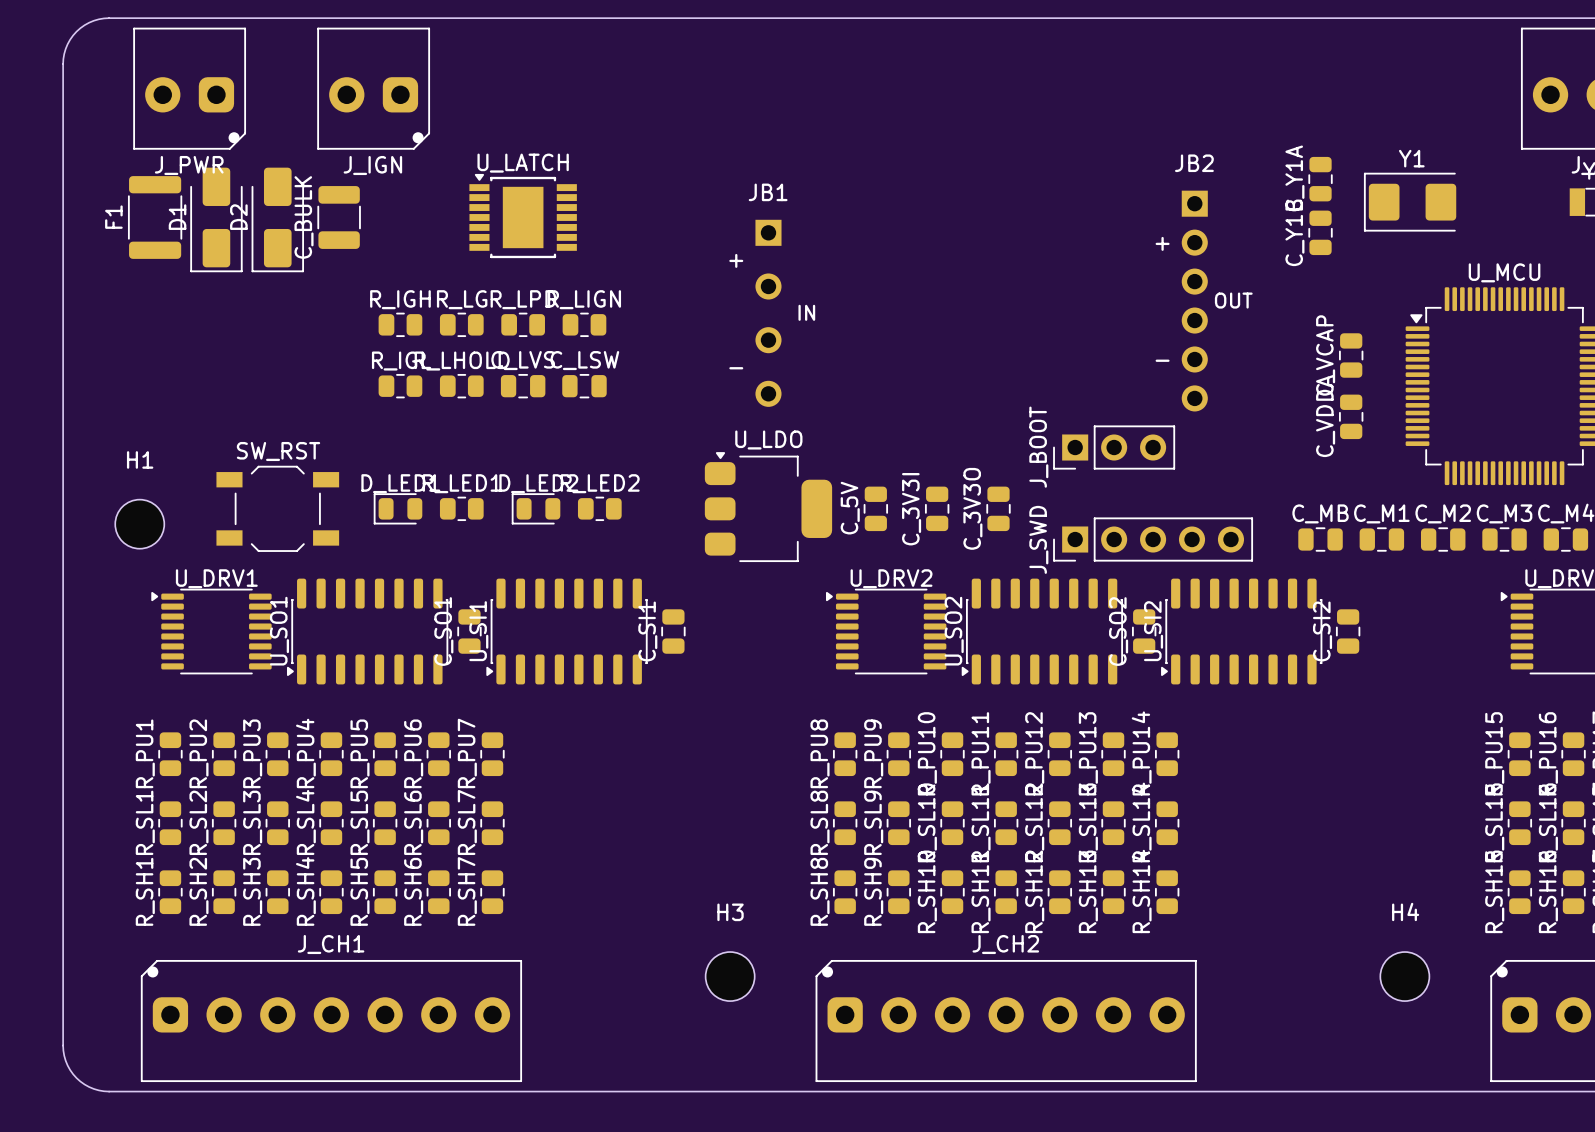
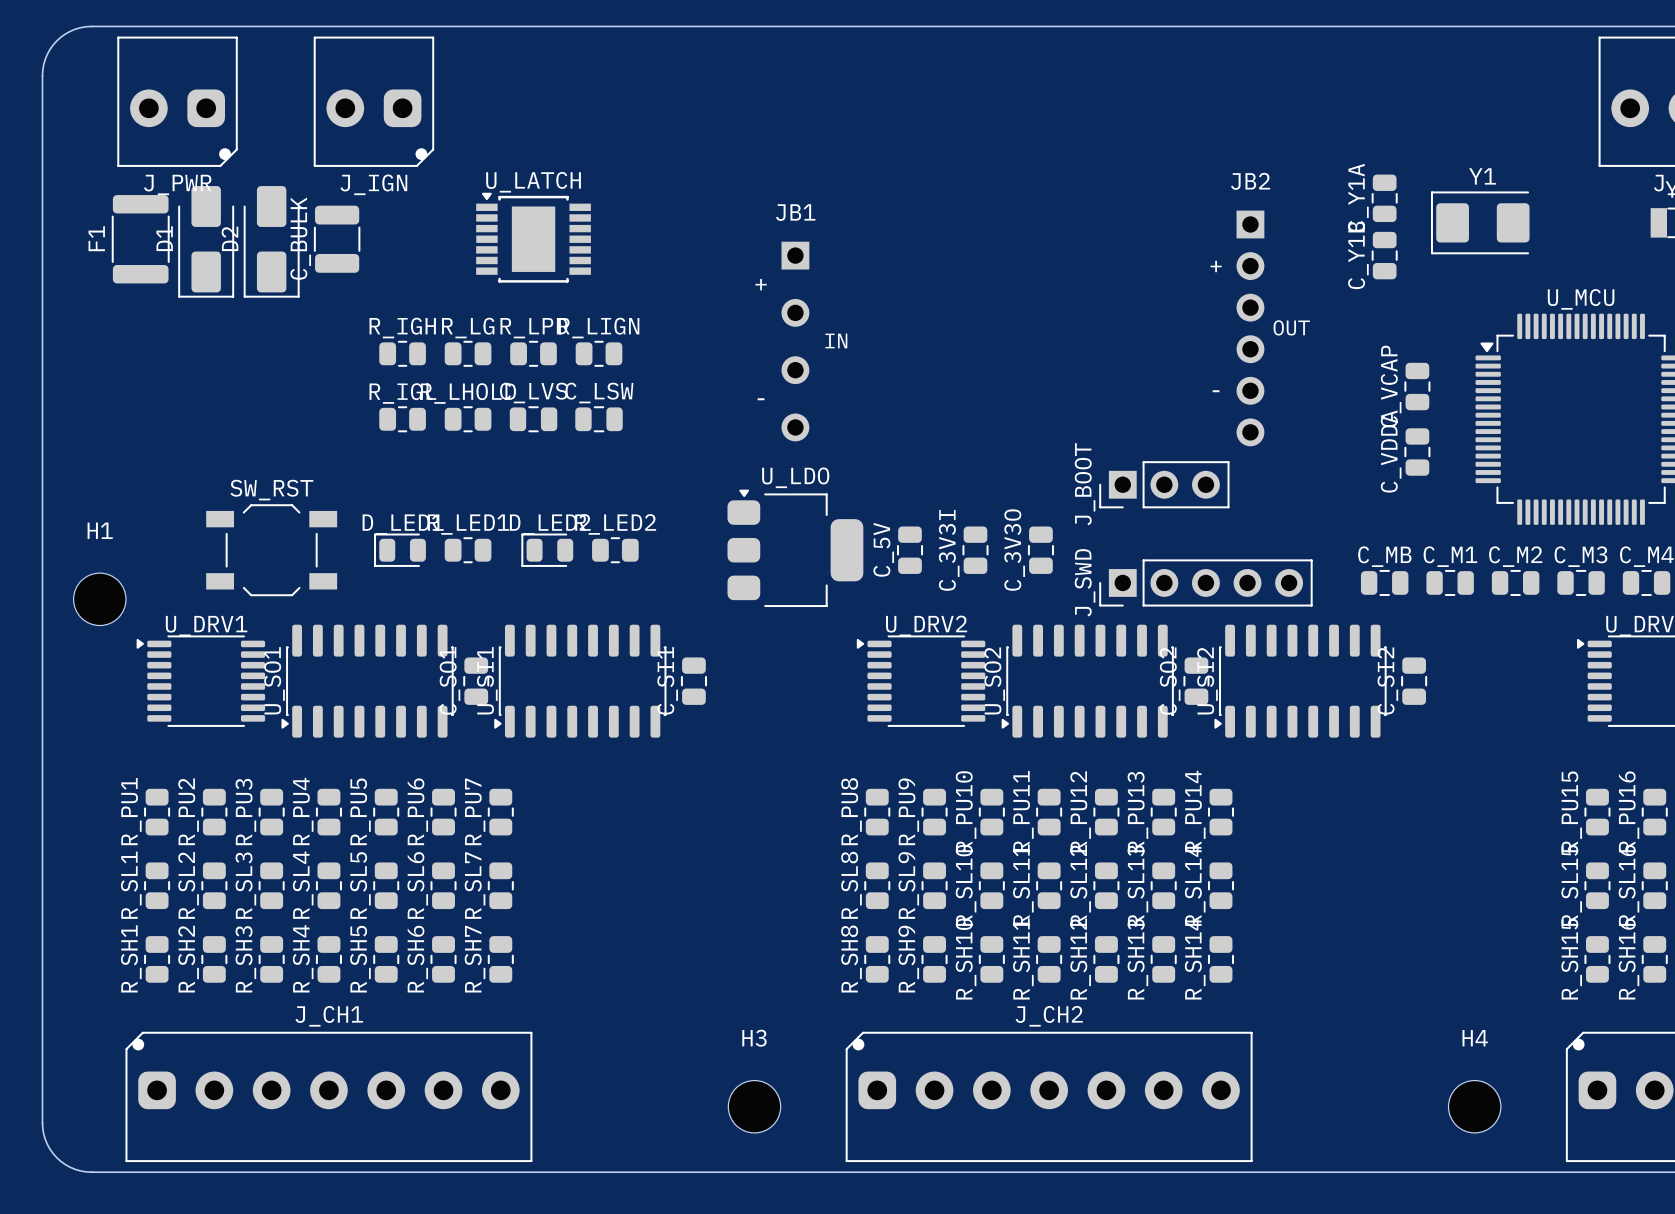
H1 position: (139, 524) -> (99, 599)
H3 position: (730, 976) -> (754, 1106)
H4 position: (1404, 976) -> (1474, 1106)

